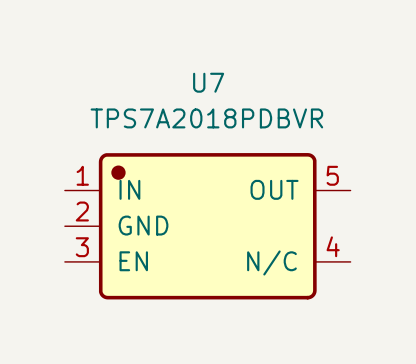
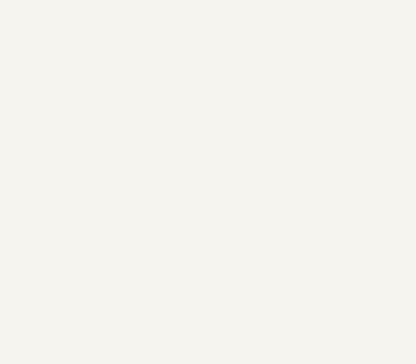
U7: TPS7A2018PDBVR (207, 226) -> none

